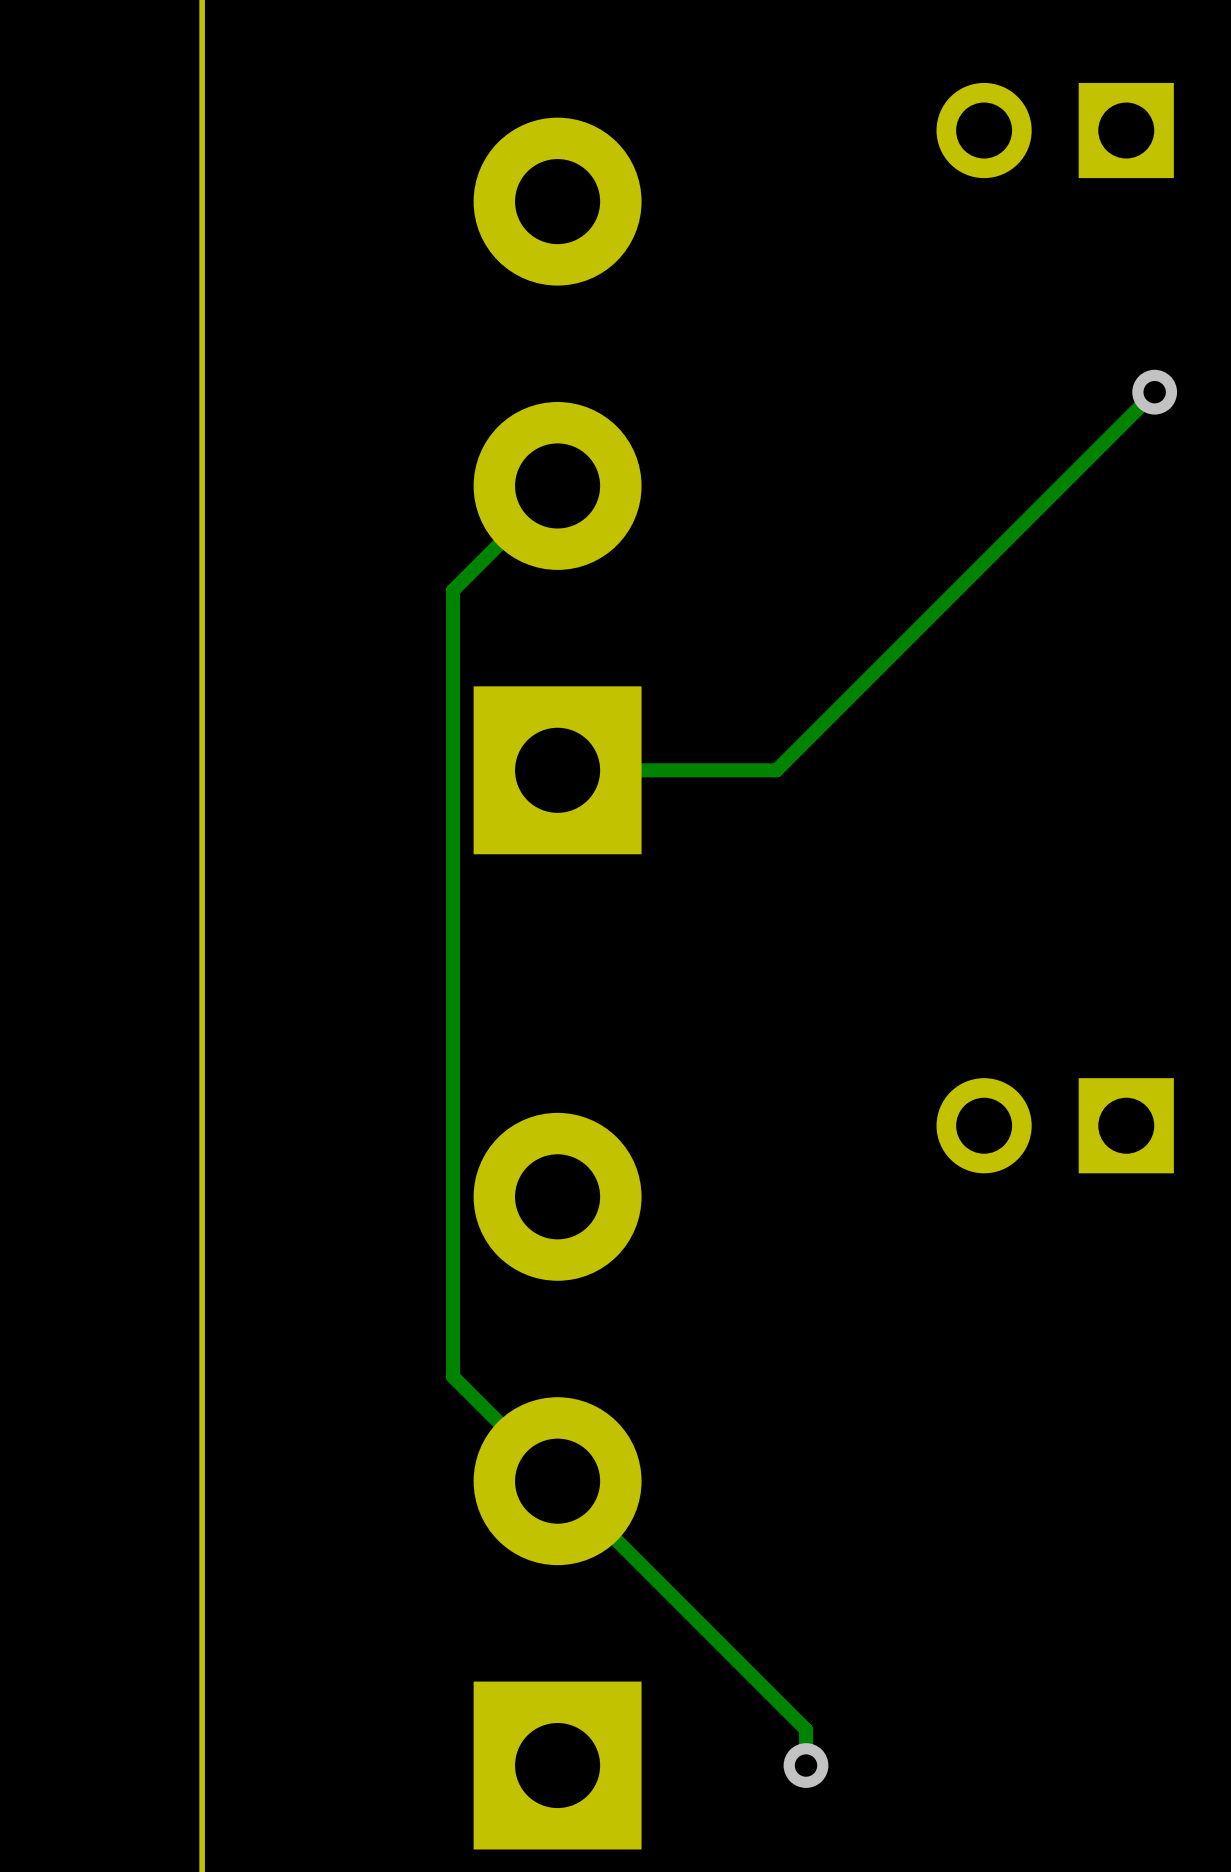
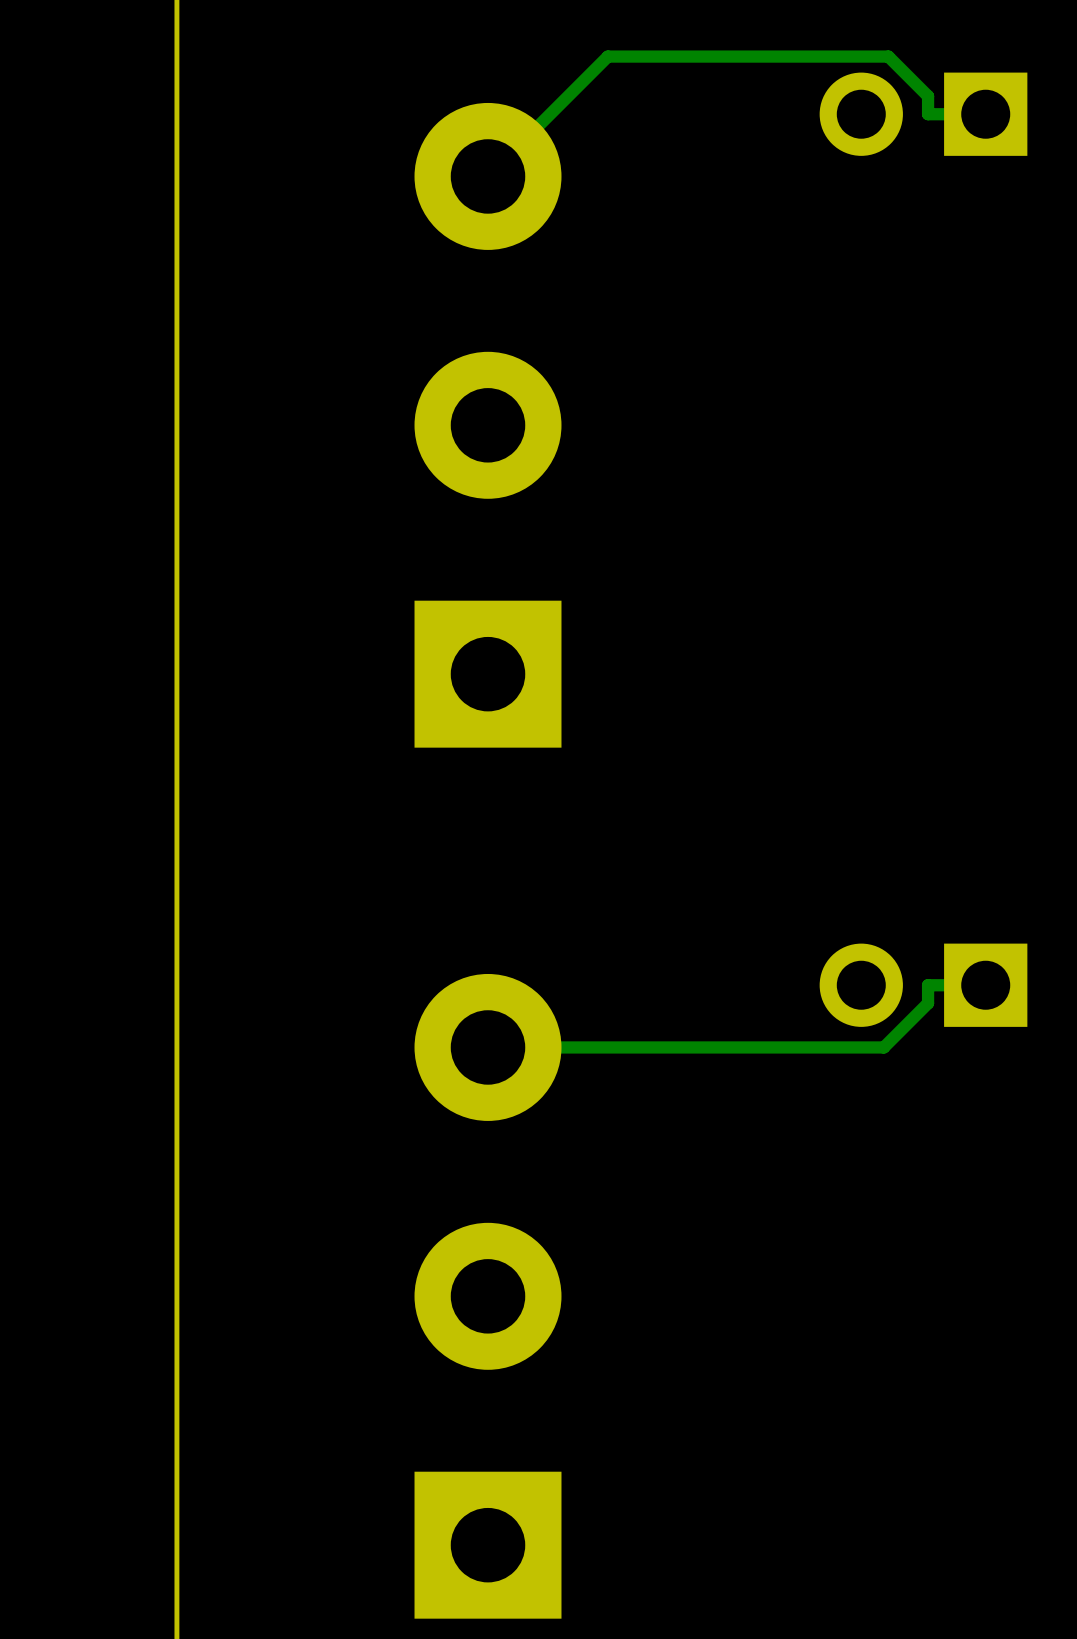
track: none -> (985, 114) (928, 114) (928, 96) (888, 56) (607, 56) (488, 176)
track: (1154, 392) (776, 770) (557, 770) -> none
via: (1154, 392) -> none
track: (557, 485) (453, 590) (453, 1376) (806, 1729) (806, 1765) -> none
track: none -> (985, 985) (928, 985) (928, 1003) (883, 1047) (488, 1047)
via: (806, 1765) -> none

